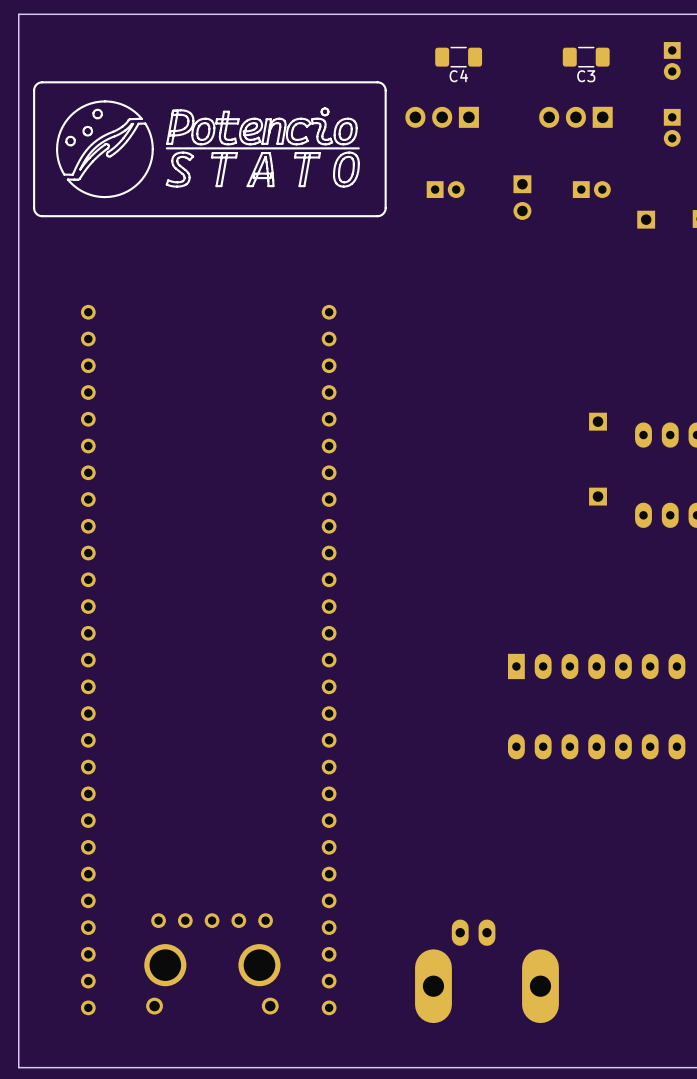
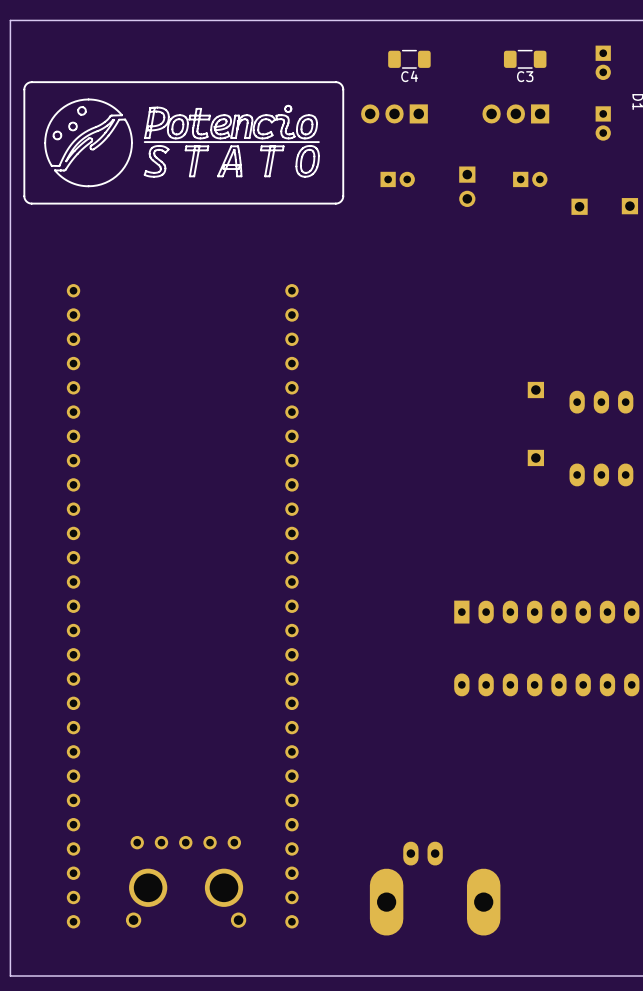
part footprint: [144, 913, 281, 1015] -> [125, 835, 247, 928]

